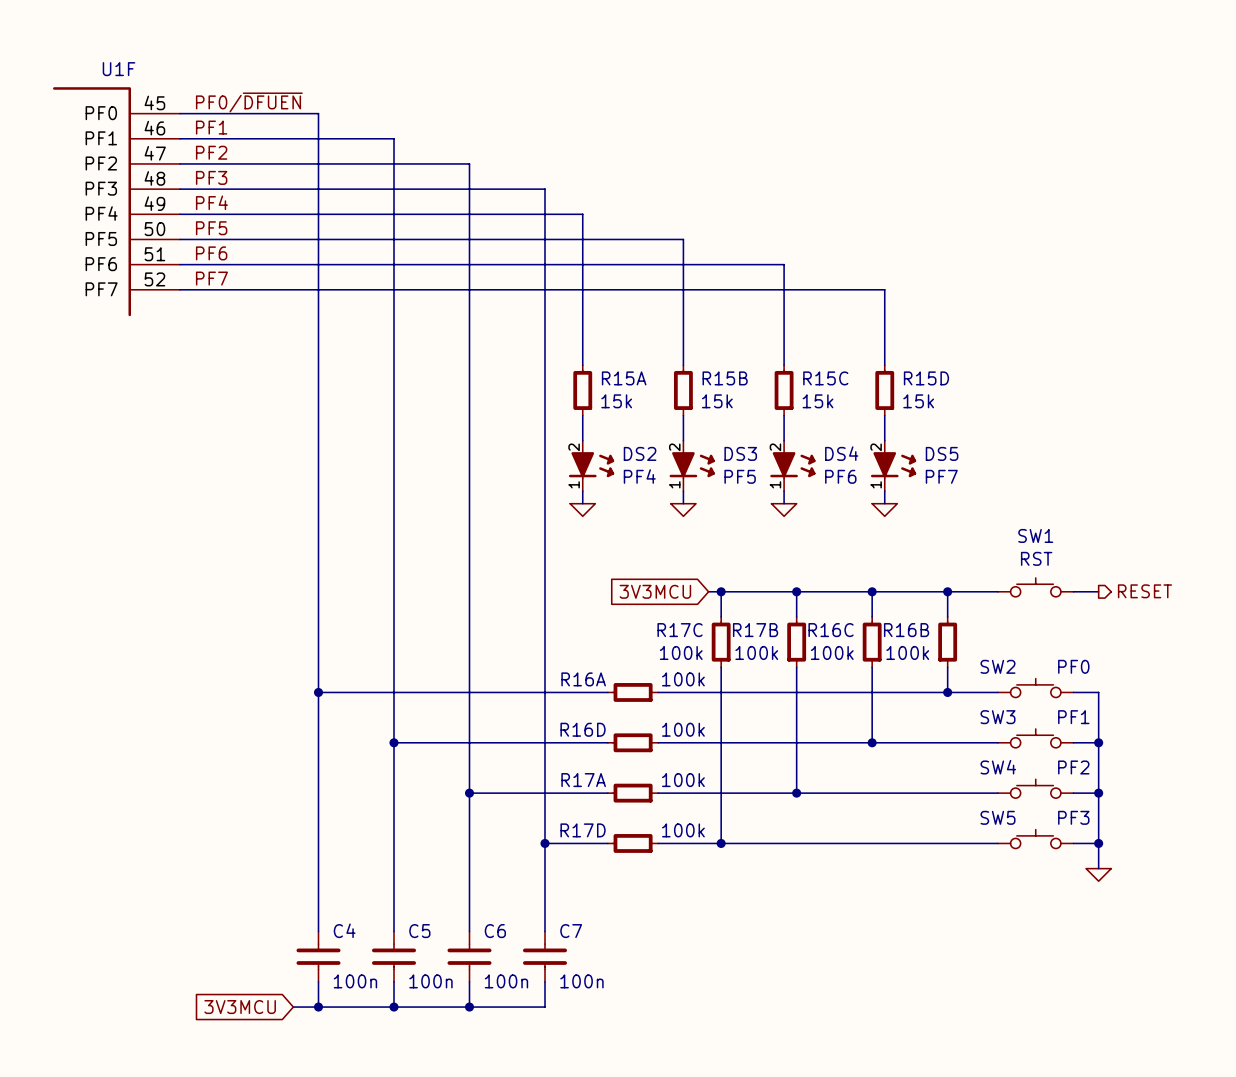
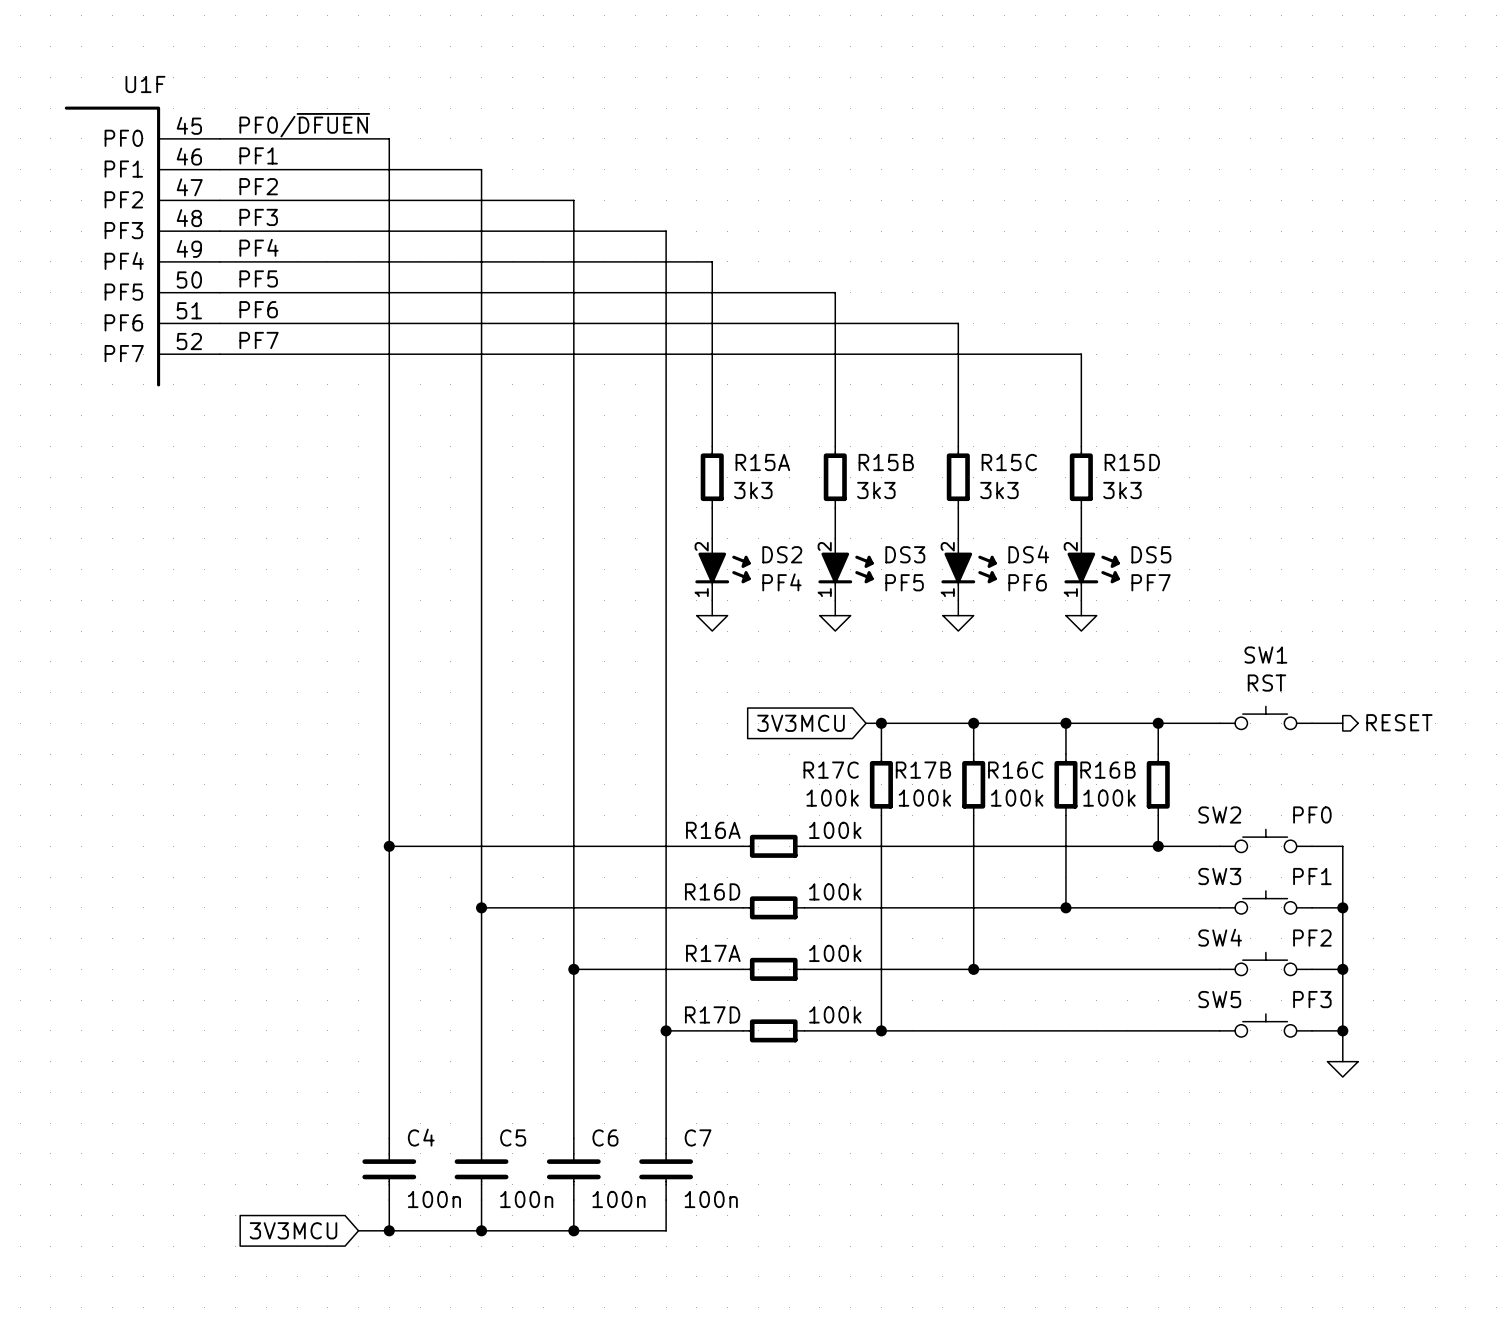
R15A value: 15k (616, 401) -> 3k3 (753, 490)
R15B value: 15k (717, 401) -> 3k3 (876, 490)
R15C value: 15k (818, 401) -> 3k3 (999, 490)
R15D value: 15k (918, 401) -> 3k3 (1122, 490)

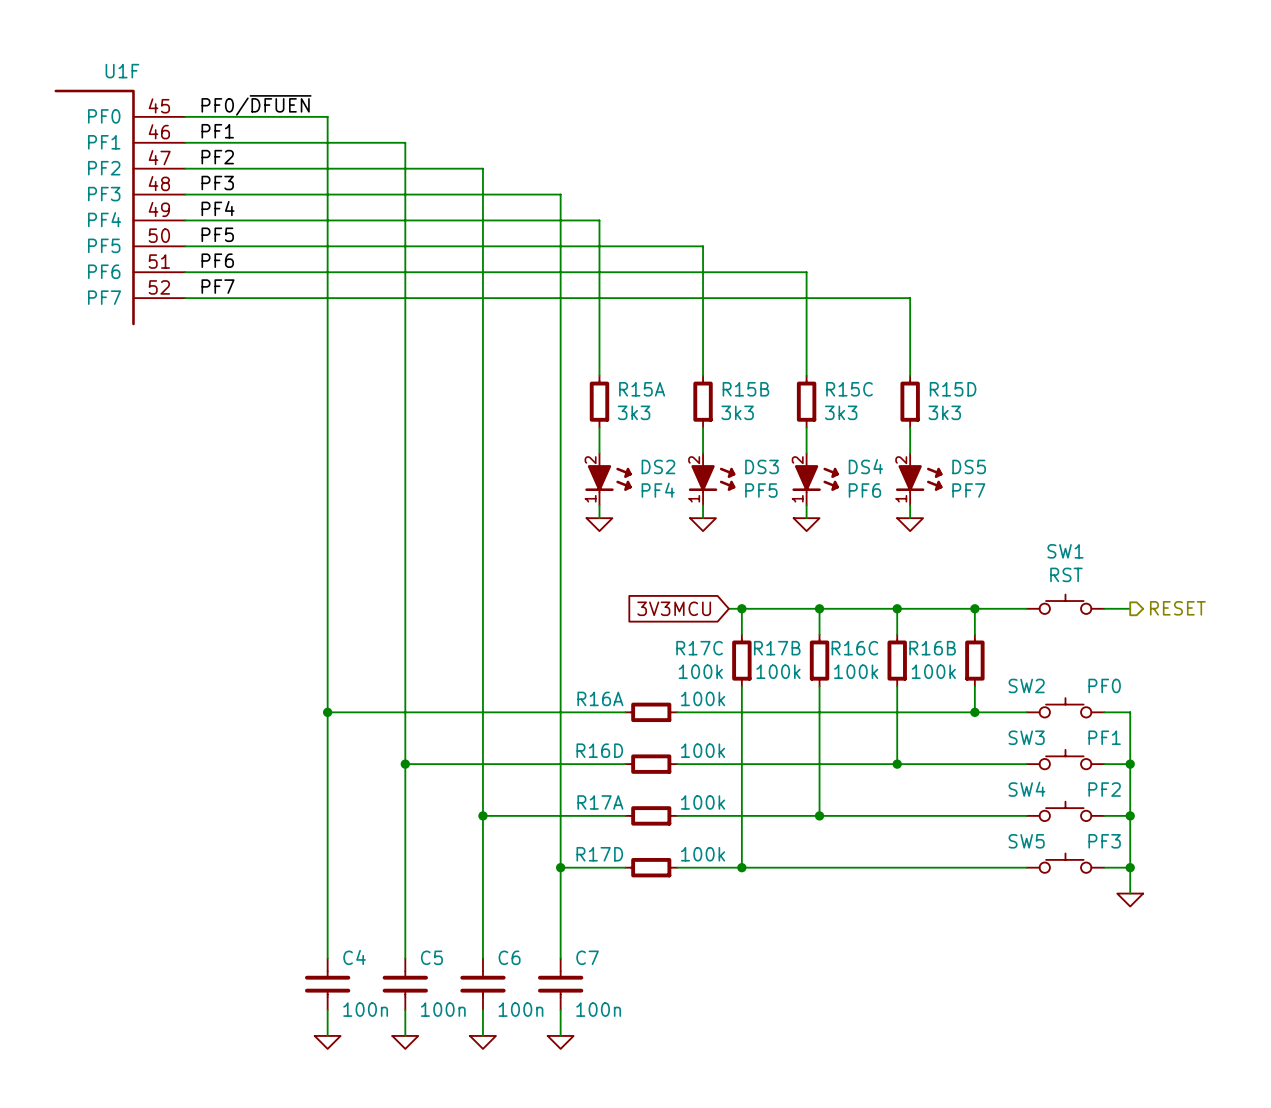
global label: 3V3MCU (293, 1230) -> none
wire: (358, 1230) (666, 1230) -> none
junction: (389, 1230) -> none
junction: (481, 1230) -> none
junction: (573, 1230) -> none
power symbol: none -> (327, 1042)
power symbol: none -> (405, 1042)
power symbol: none -> (482, 1042)
power symbol: none -> (560, 1042)

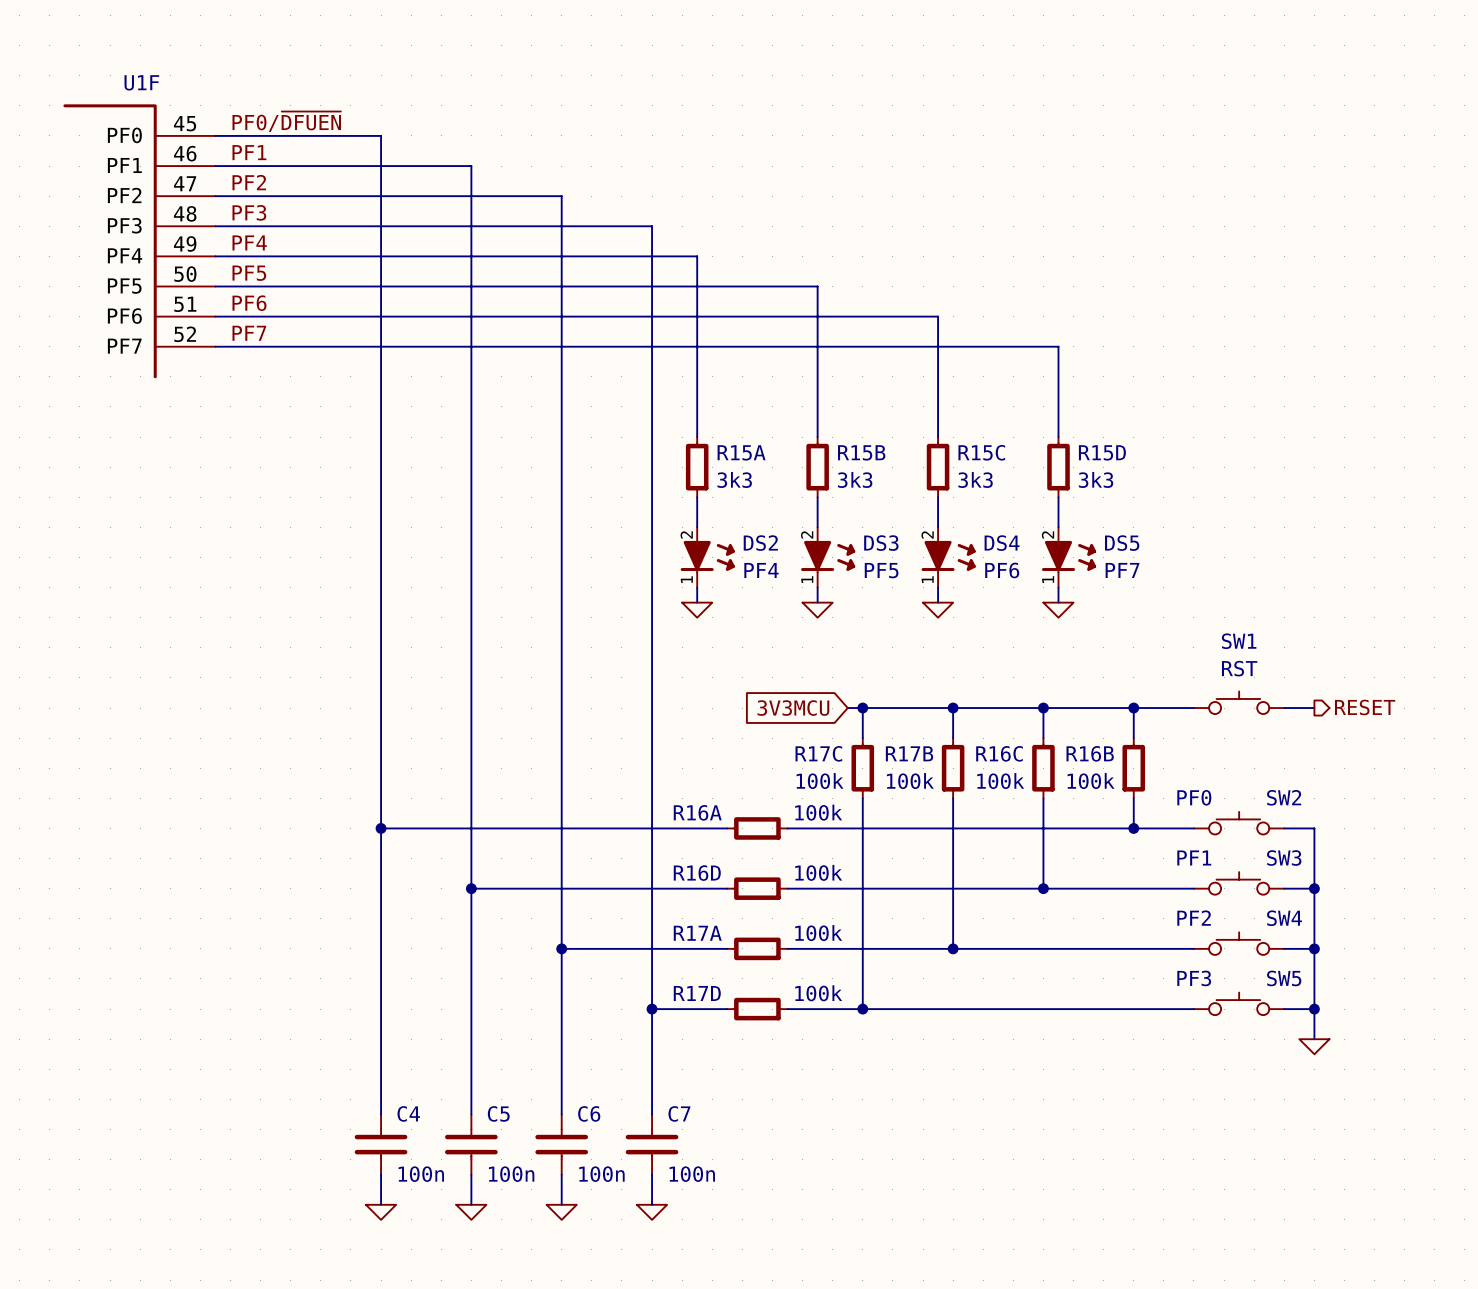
SW2 name position: SW2 (1026, 685) -> SW2 (1284, 797)
SW2 value position: PF0 (1104, 685) -> PF0 (1194, 797)
SW3 name position: SW3 (1026, 737) -> SW3 (1284, 858)
SW3 value position: PF1 (1104, 737) -> PF1 (1194, 858)
SW4 name position: SW4 (1026, 789) -> SW4 (1284, 918)
SW4 value position: PF2 (1104, 789) -> PF2 (1194, 918)
SW5 name position: SW5 (1026, 841) -> SW5 (1284, 978)
SW5 value position: PF3 (1104, 841) -> PF3 (1194, 978)

